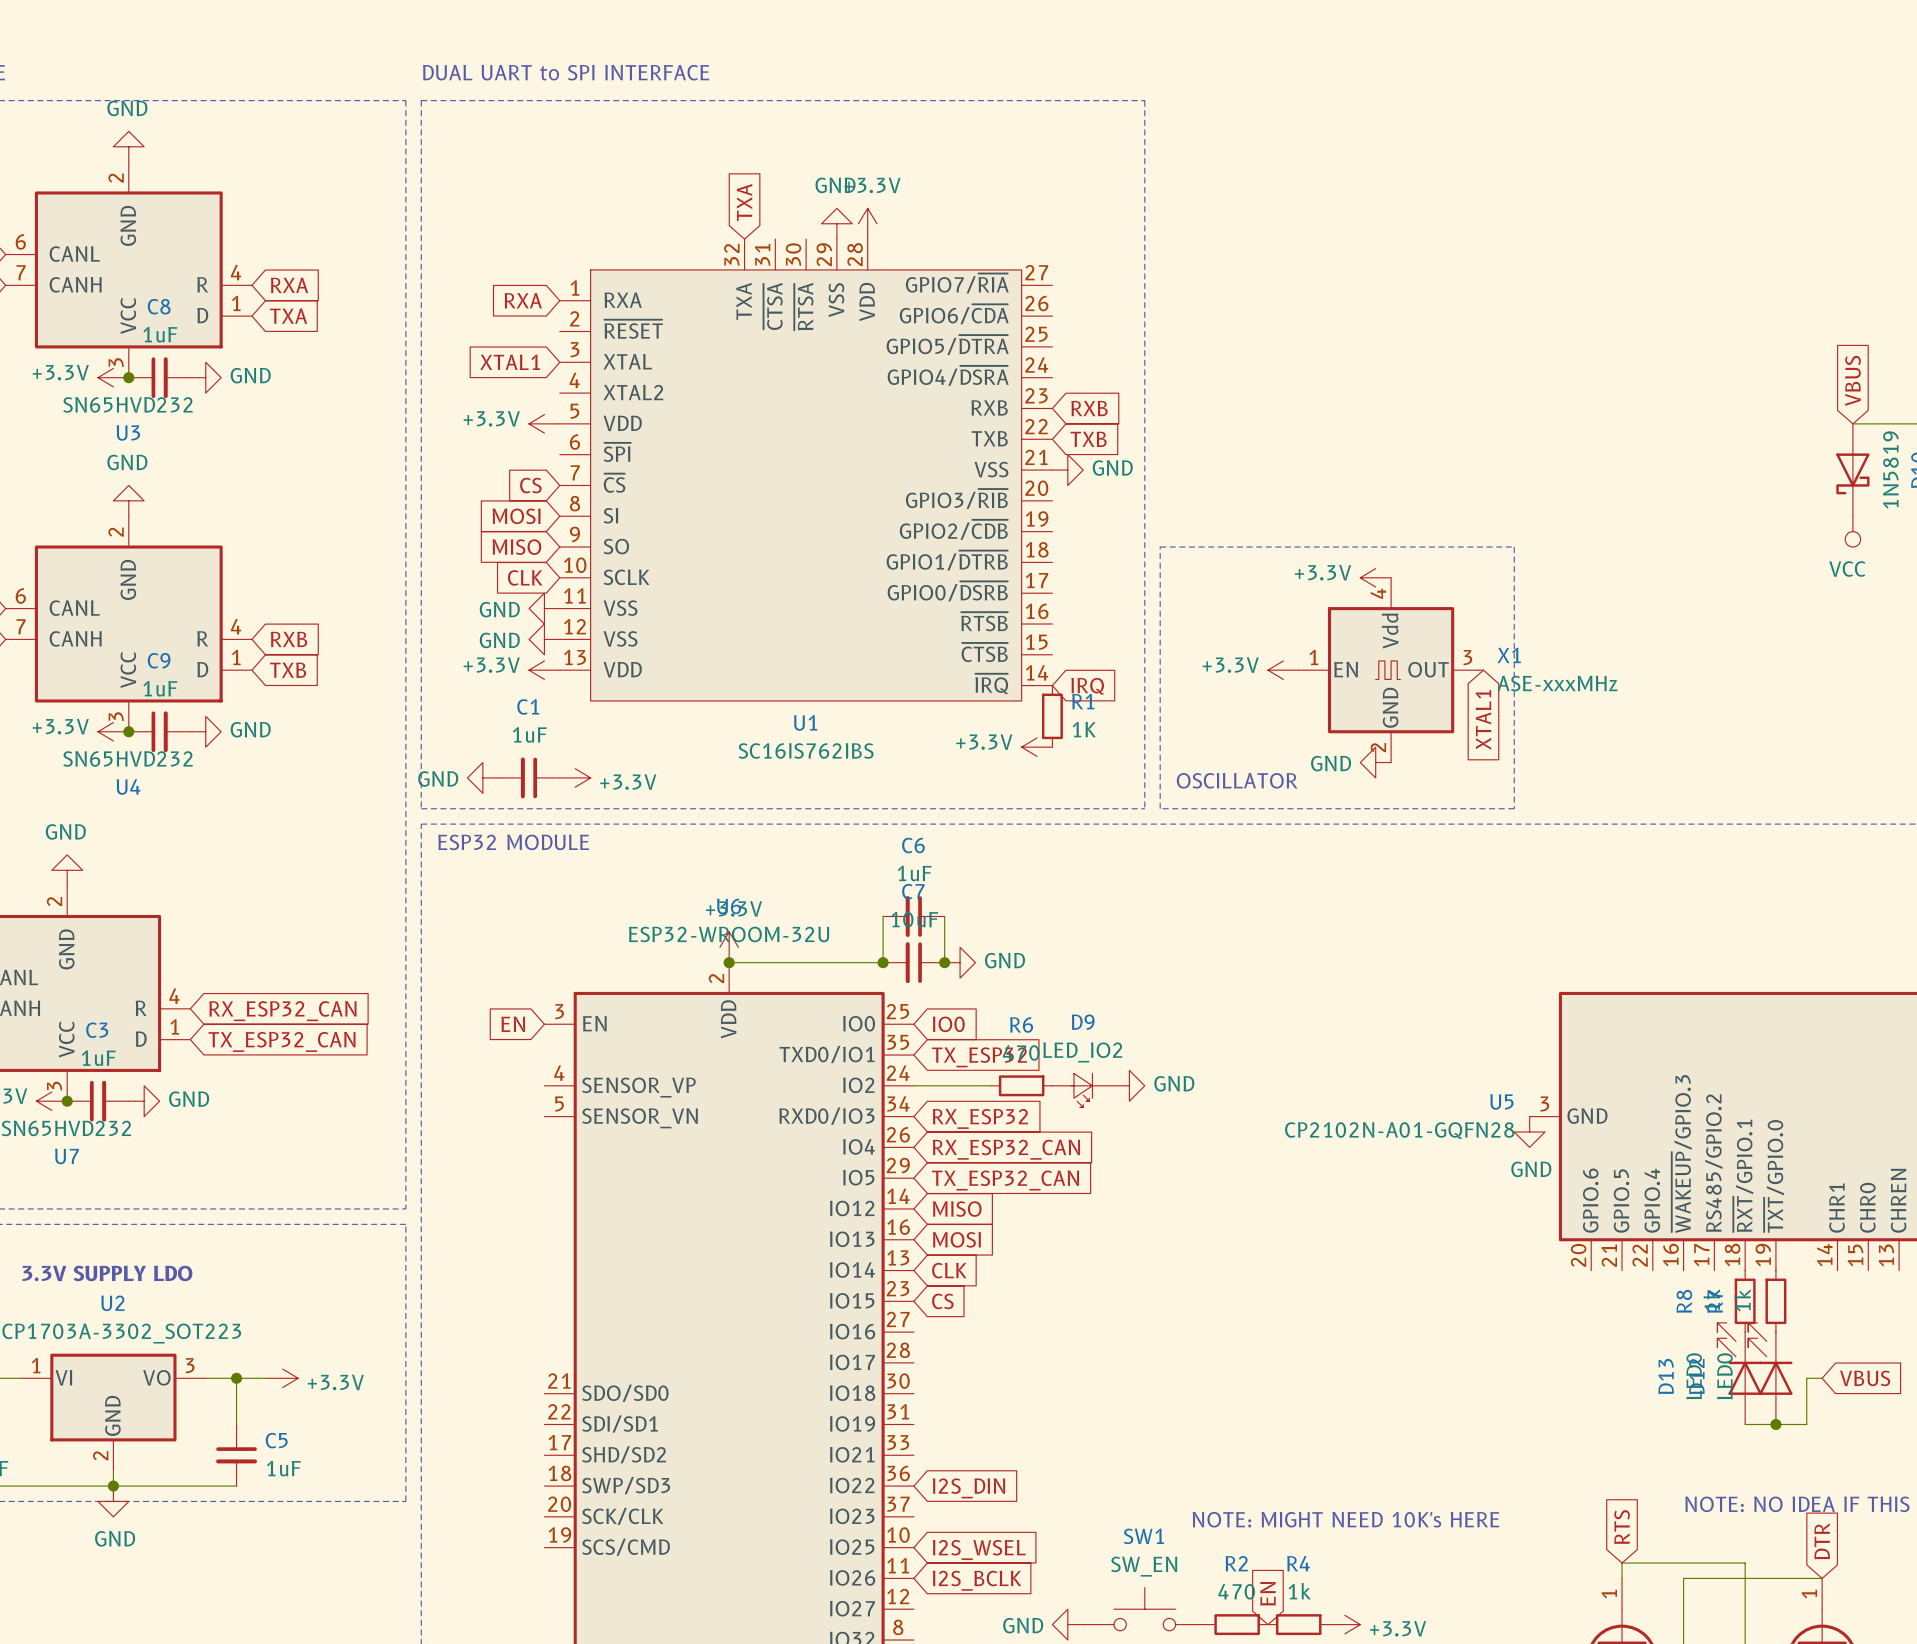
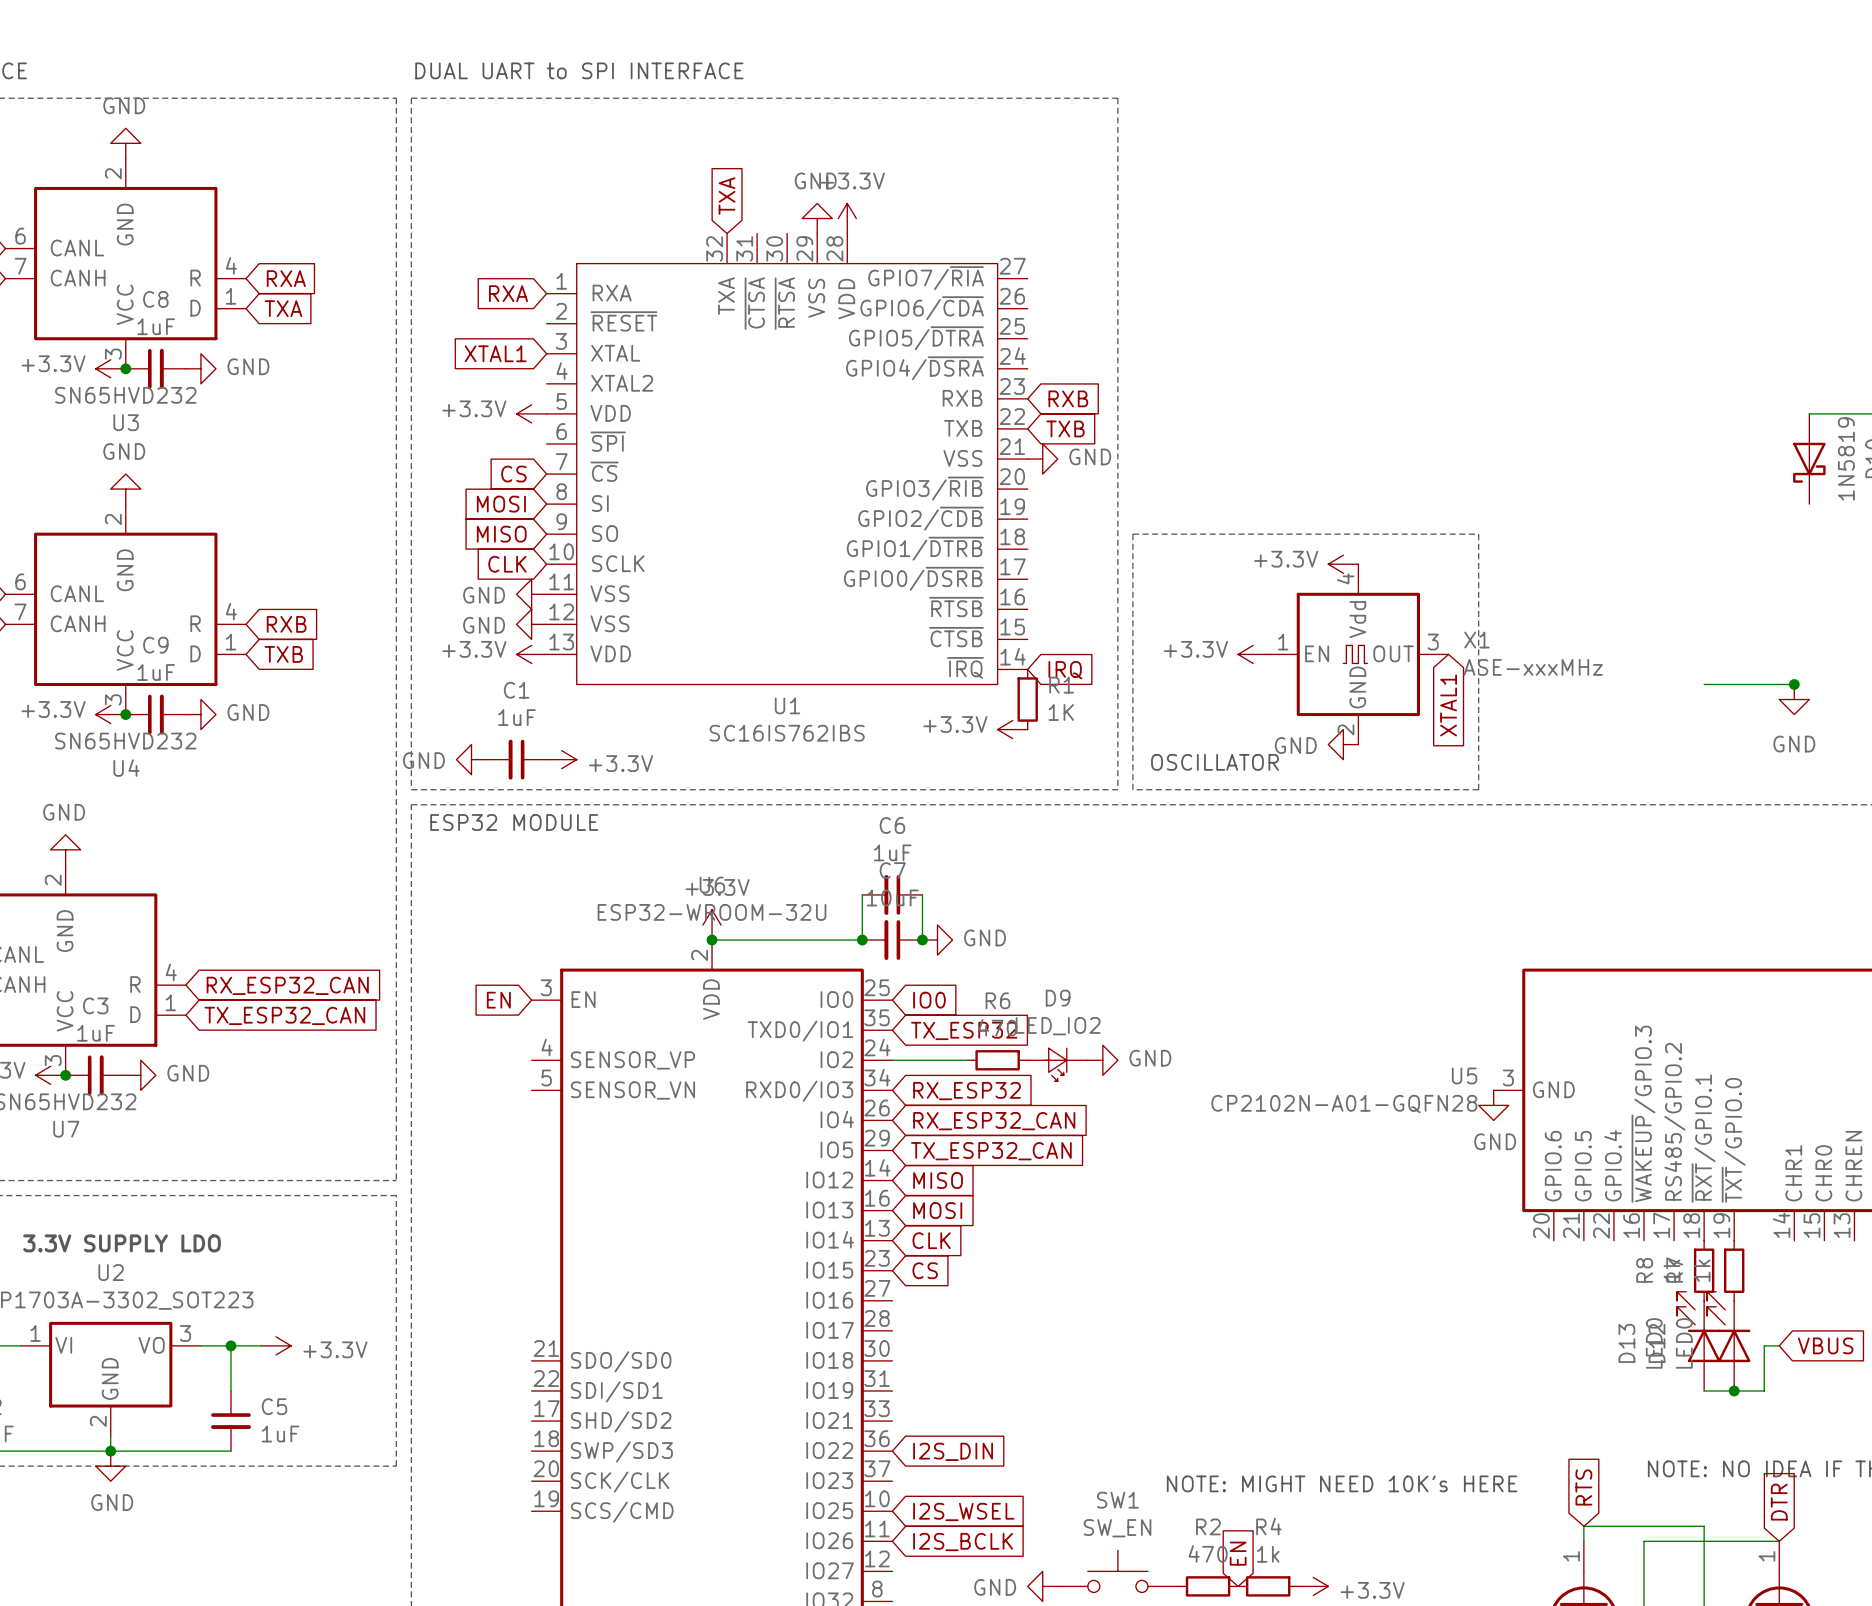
global label: VBUS (1853, 380) -> none
power symbol: VCC (1852, 531) -> none
wire: none -> (1704, 684) (1794, 684)
junction: none -> (1794, 684)
power symbol: none -> GND (1794, 699)

